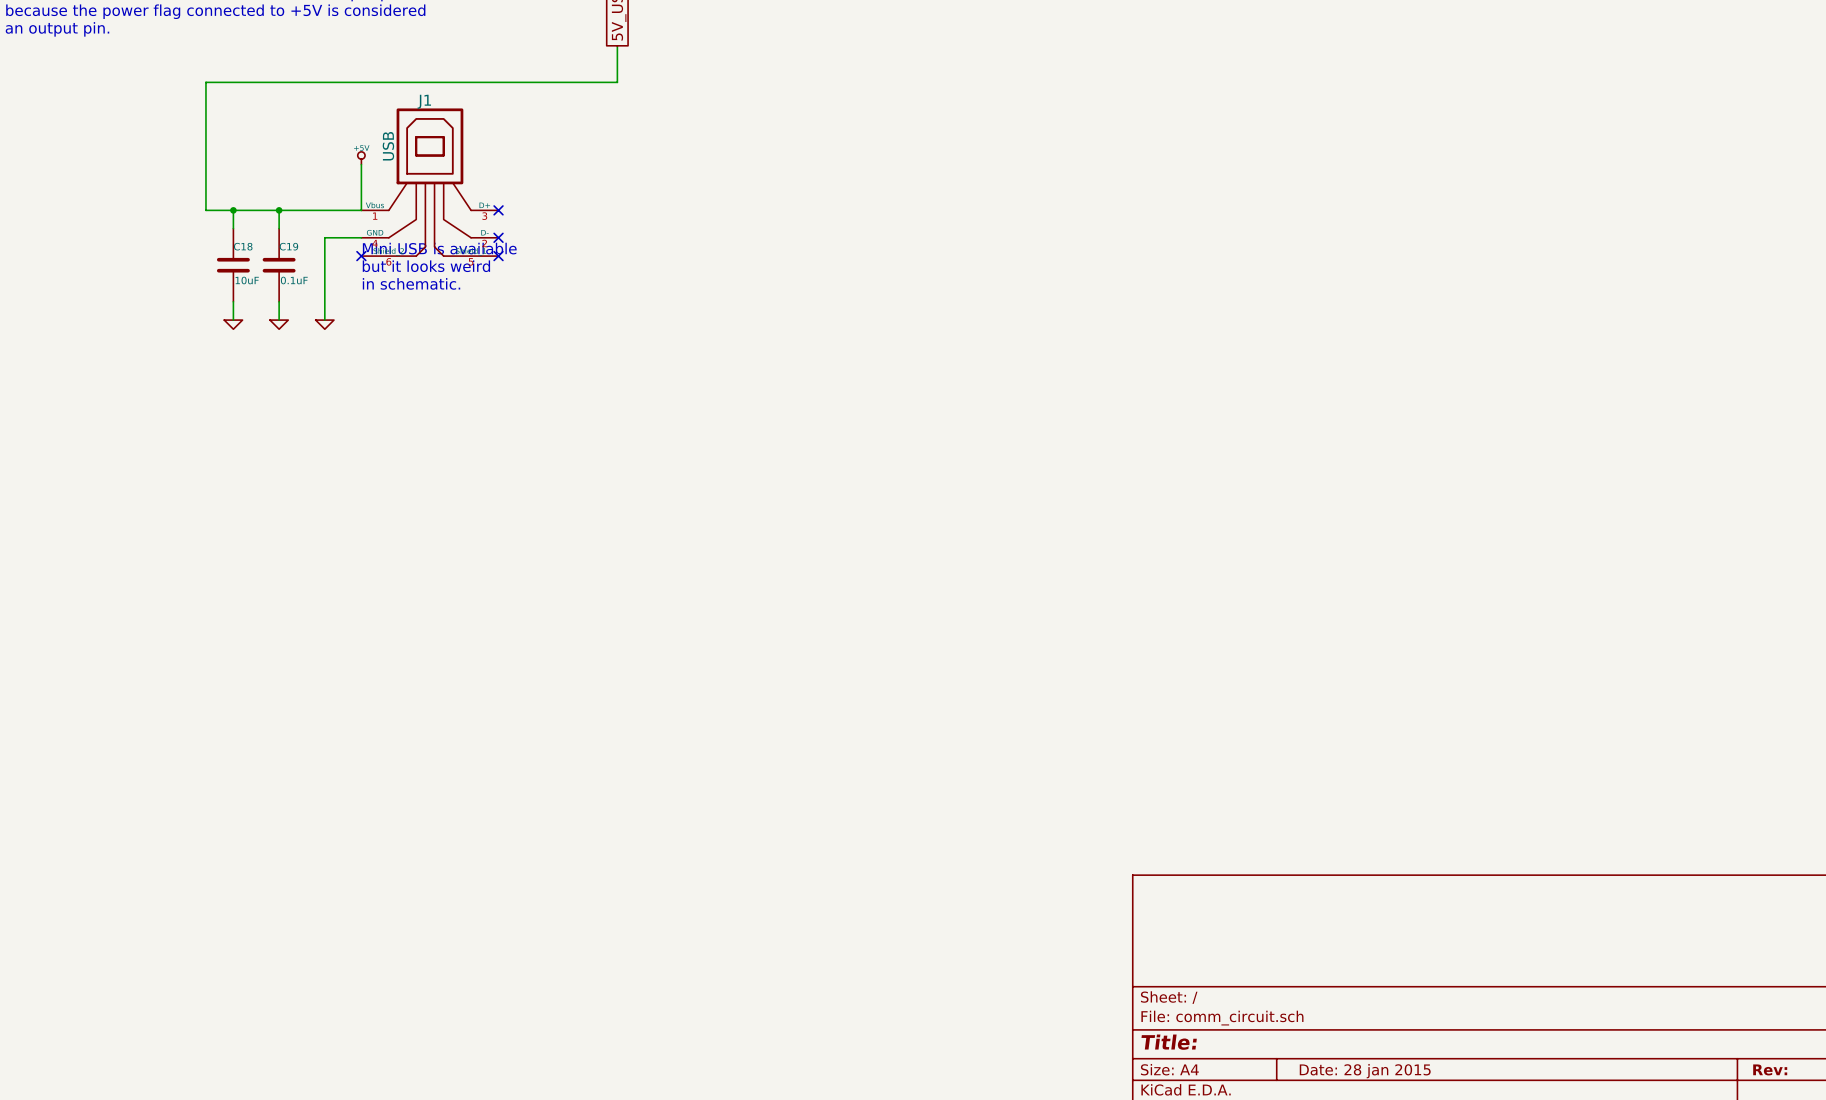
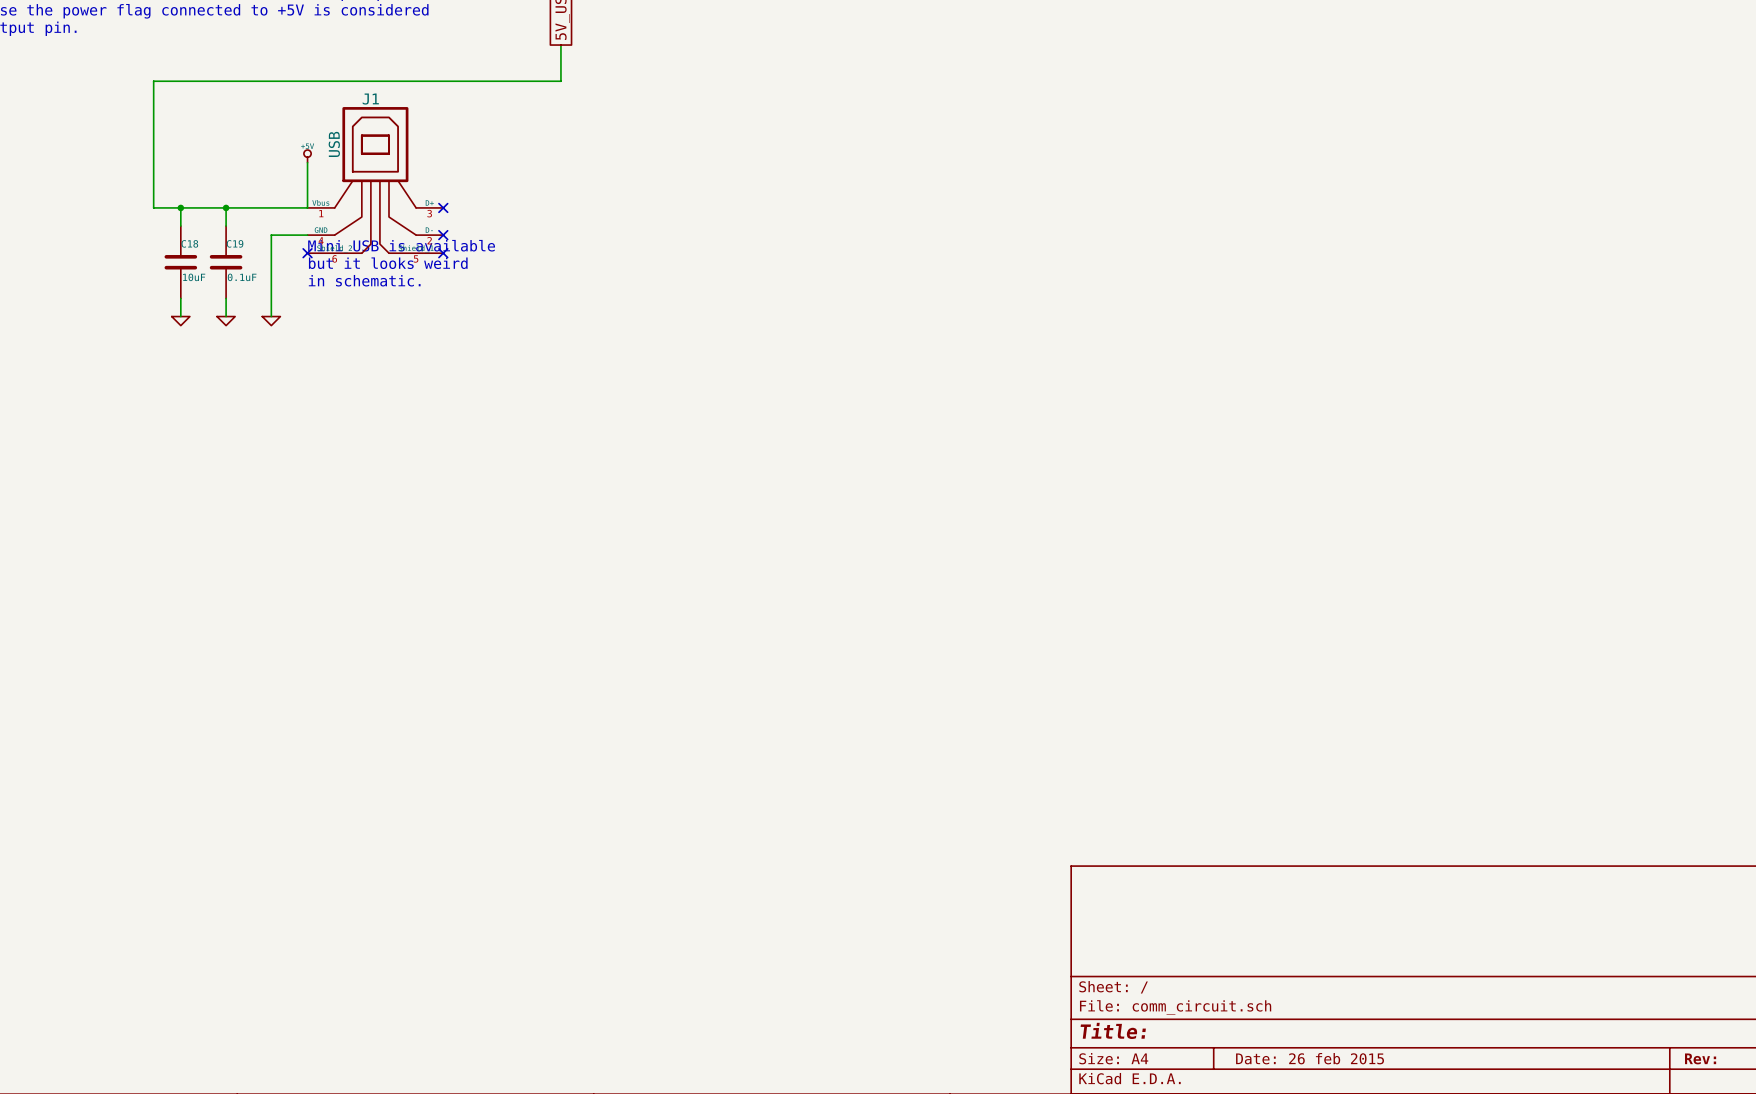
title block: Date: 28 jan 2015 (1365, 1071) -> Date: 26 feb 2015 (1310, 1058)

